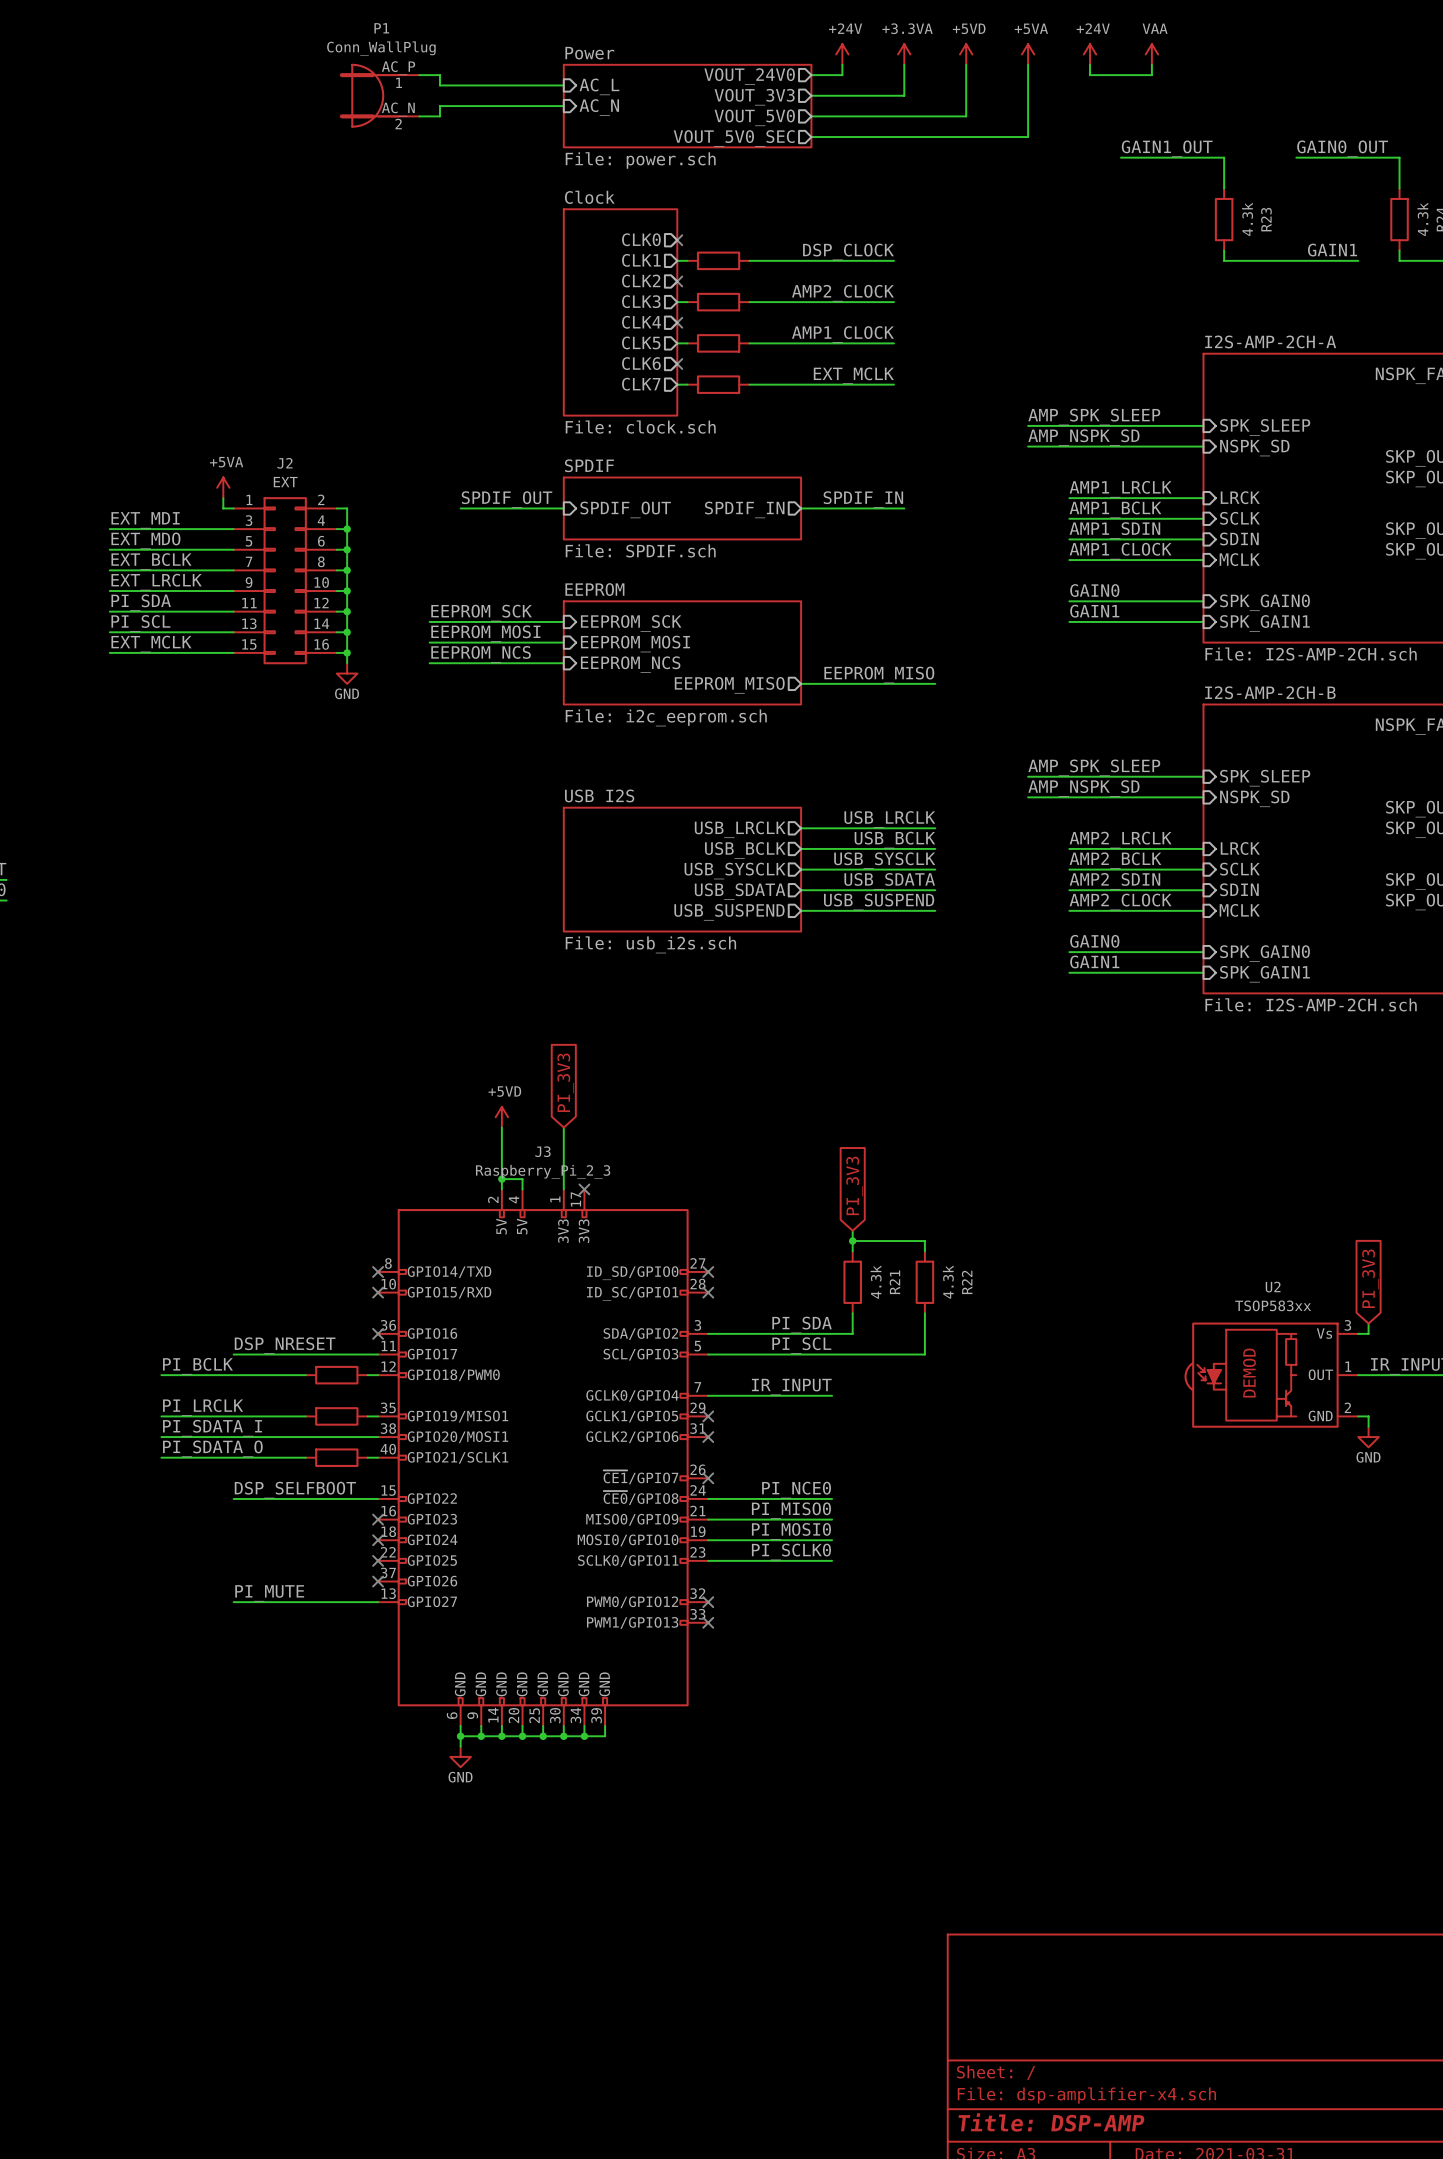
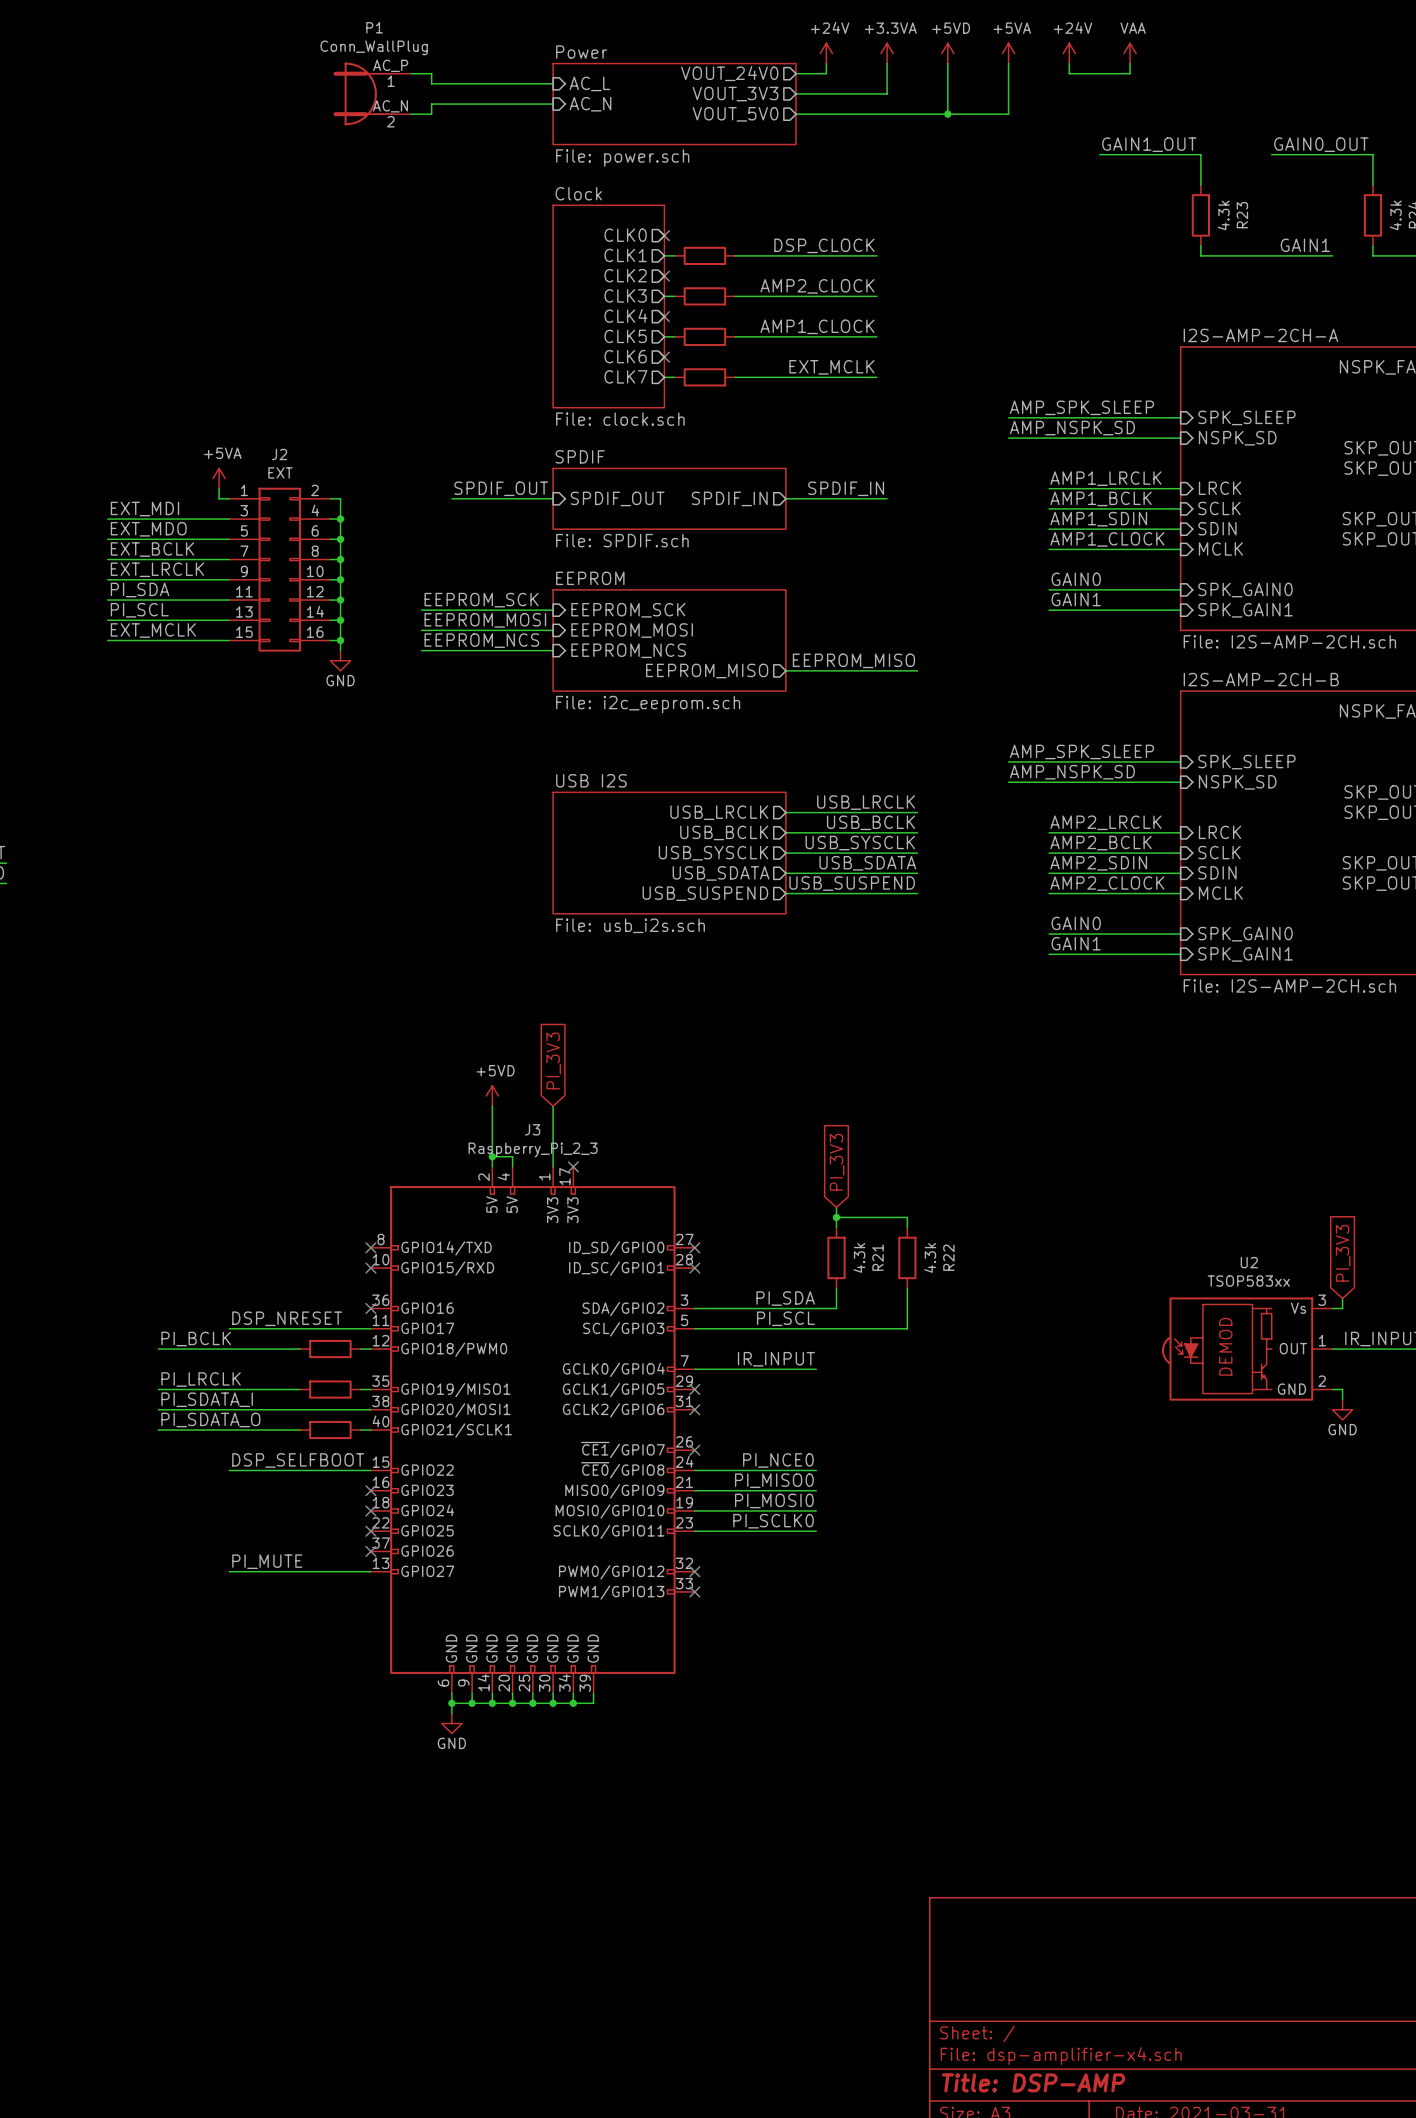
junction: none -> (947, 114)
wire: (1028, 116) (1028, 137) (811, 137) -> (1008, 114) (947, 114)
sheet pin: VOUT_5V0_SEC (734, 138) -> none

